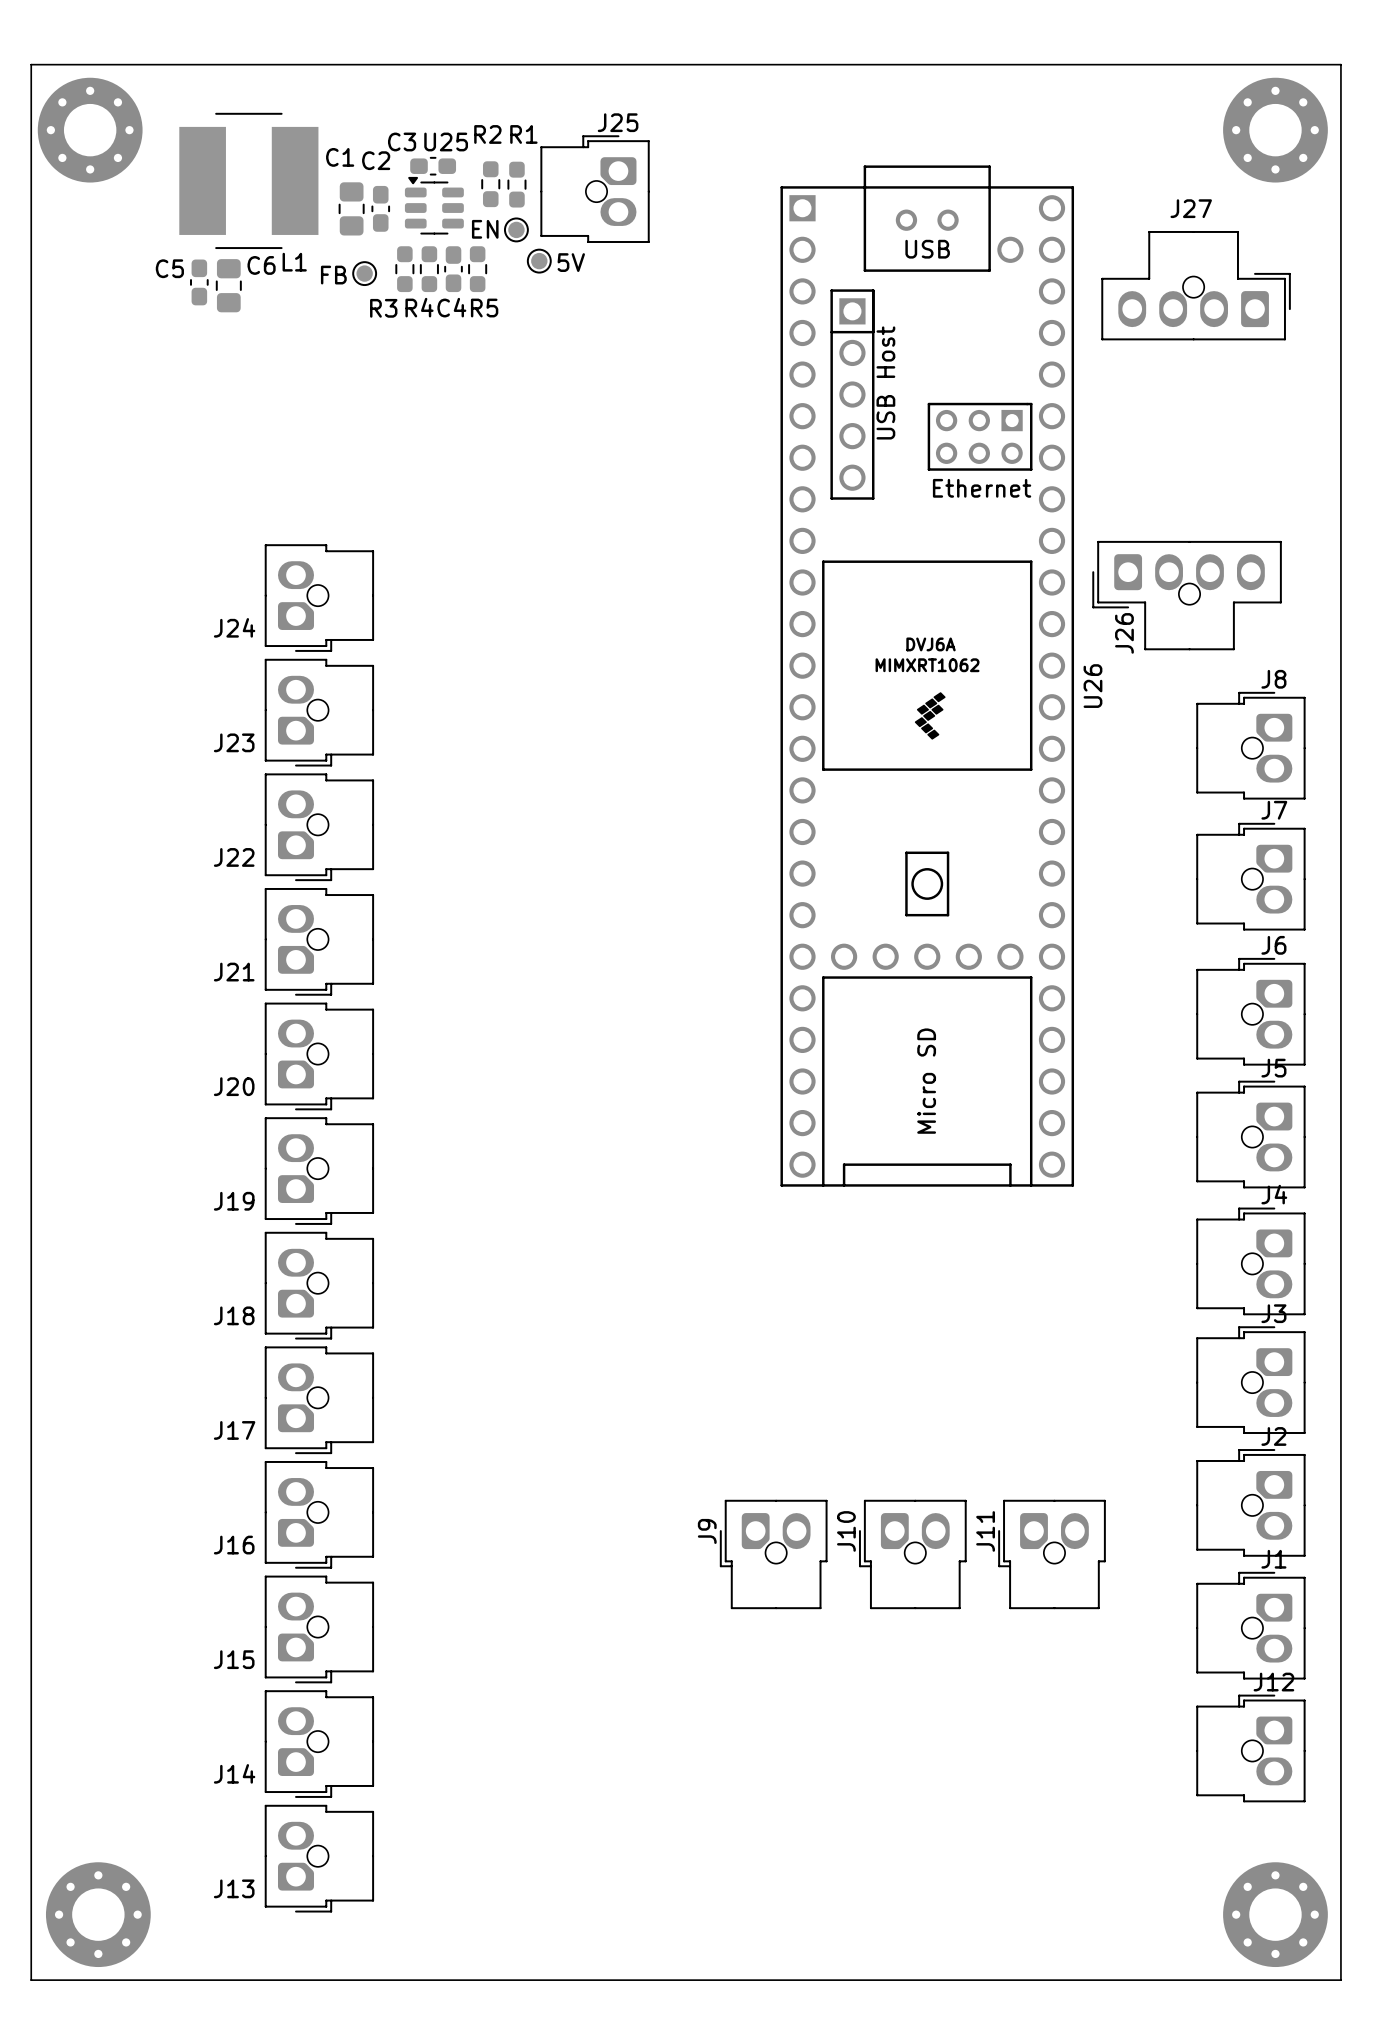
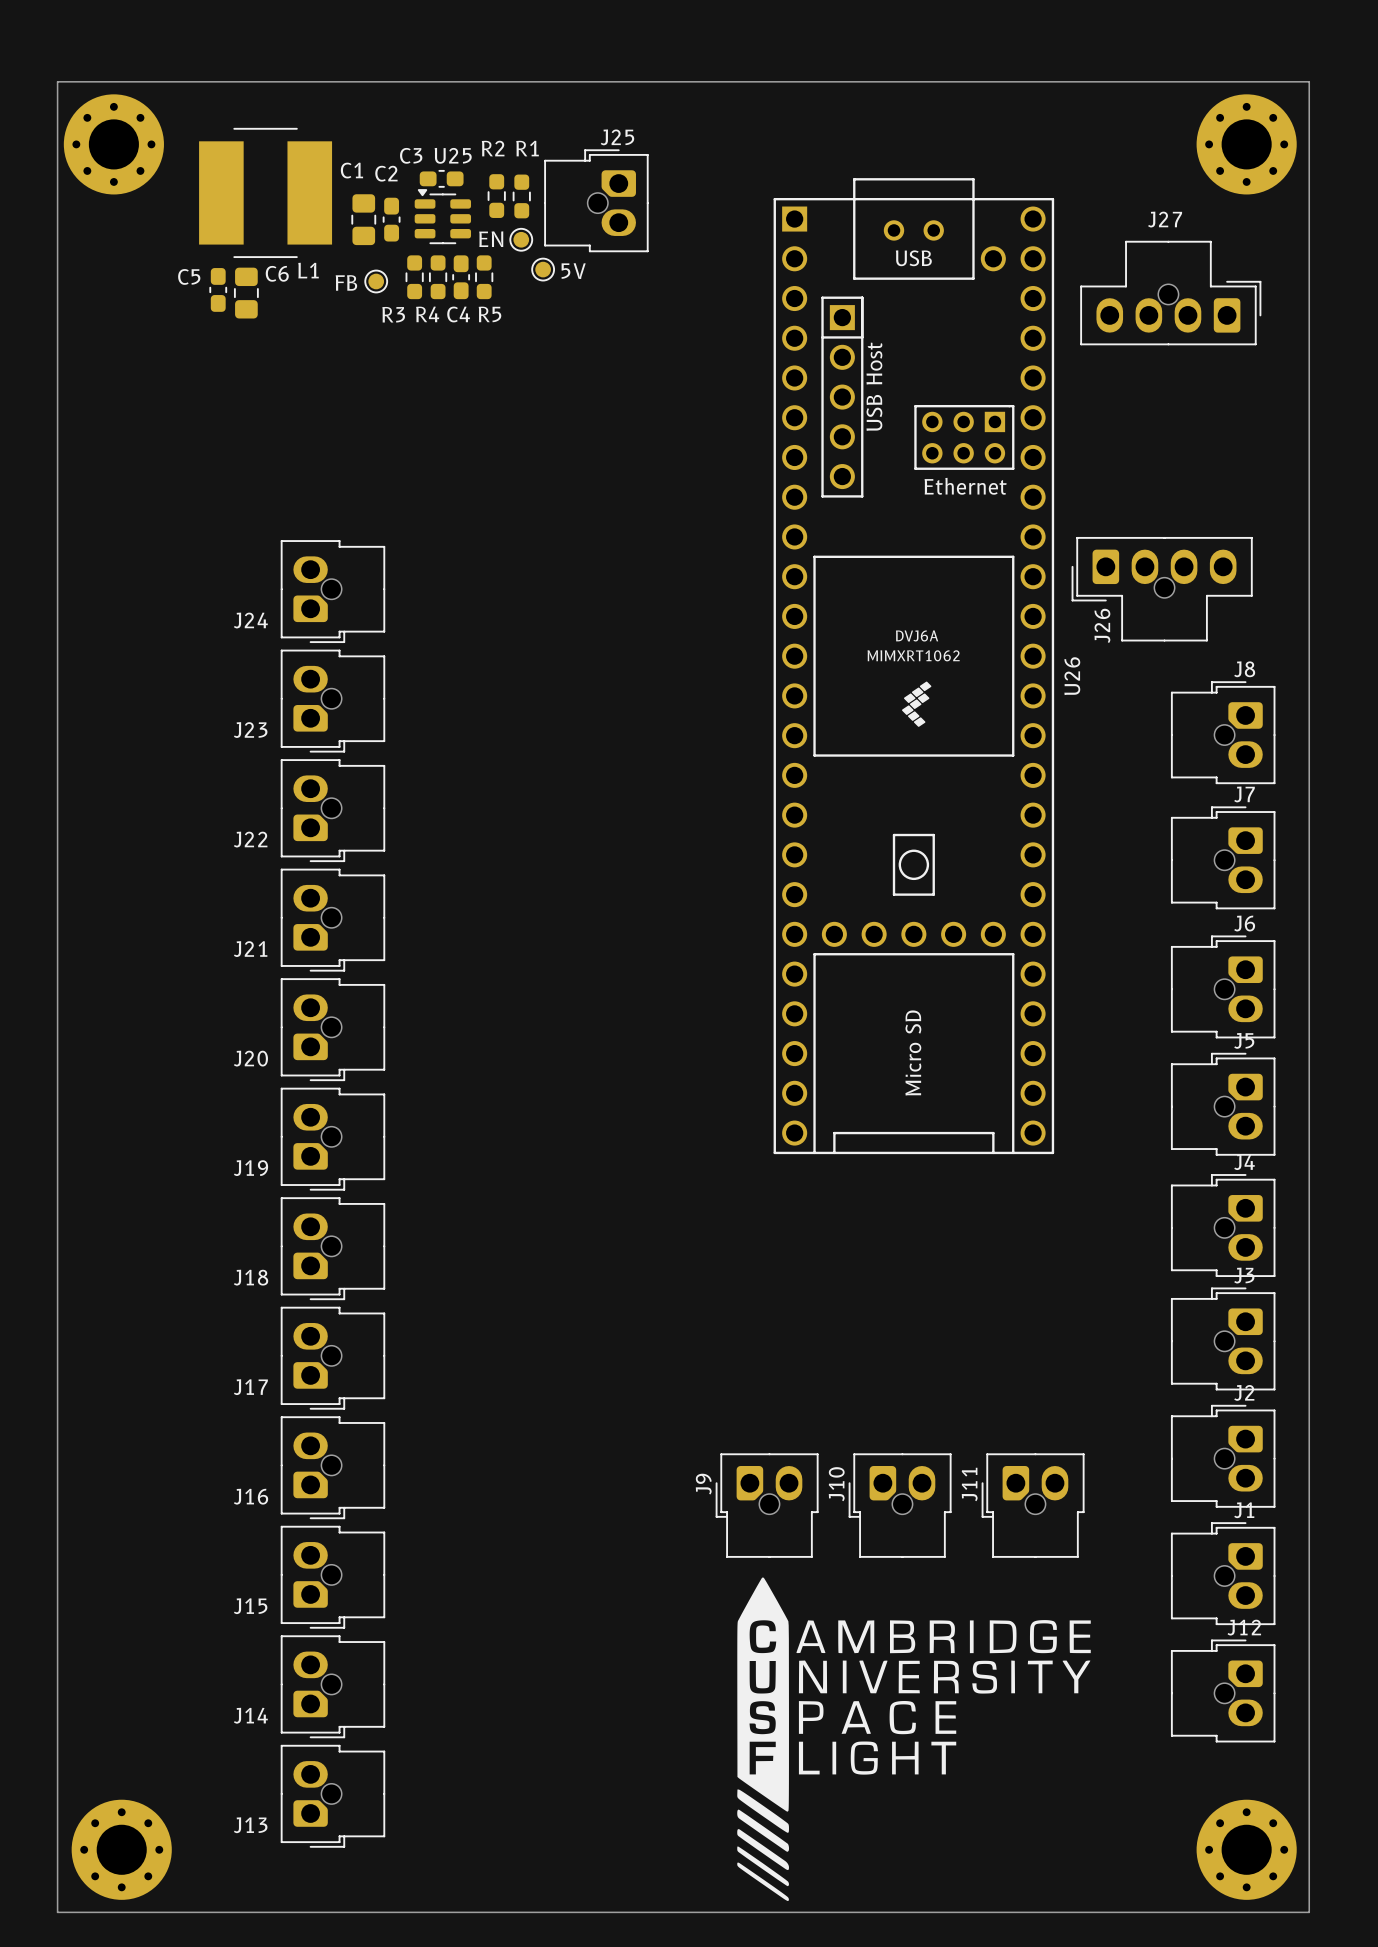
drawing: none -> [737, 1577, 1091, 1902]

